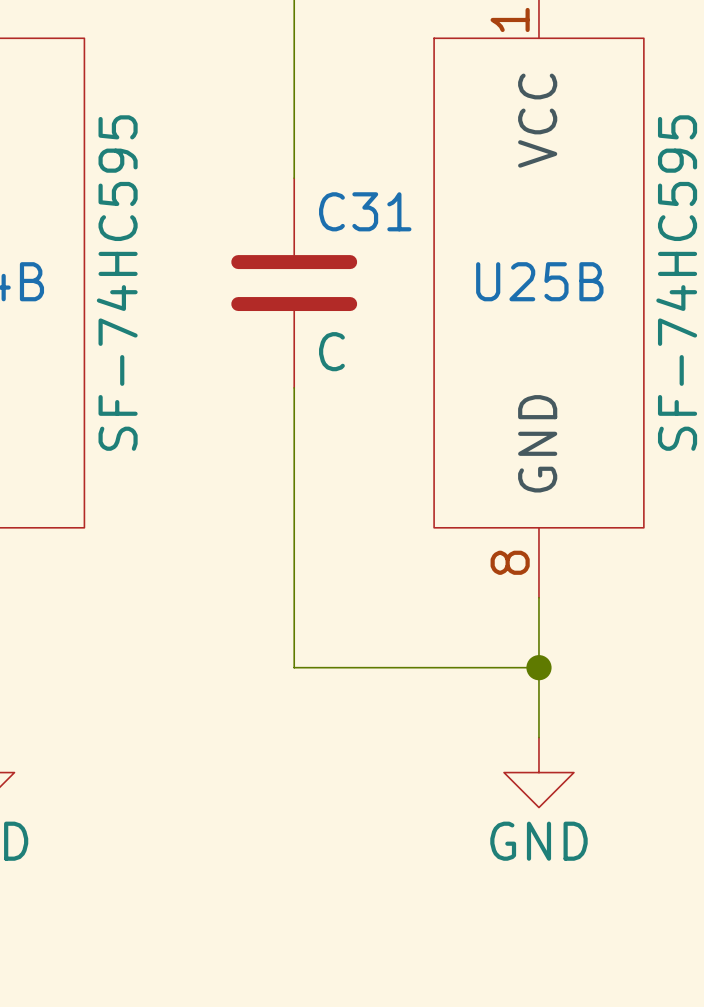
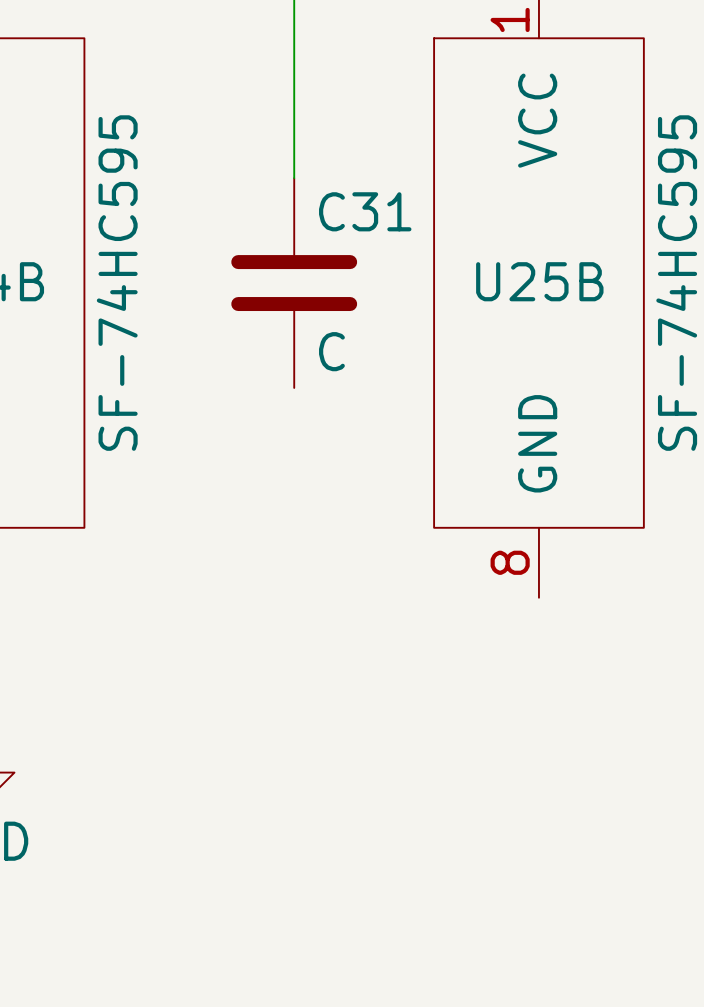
wire: (294, 387) (294, 667) (538, 667) -> none
wire: (538, 597) (538, 737) -> none
junction: (538, 667) -> none
power symbol: GND (538, 772) -> none

